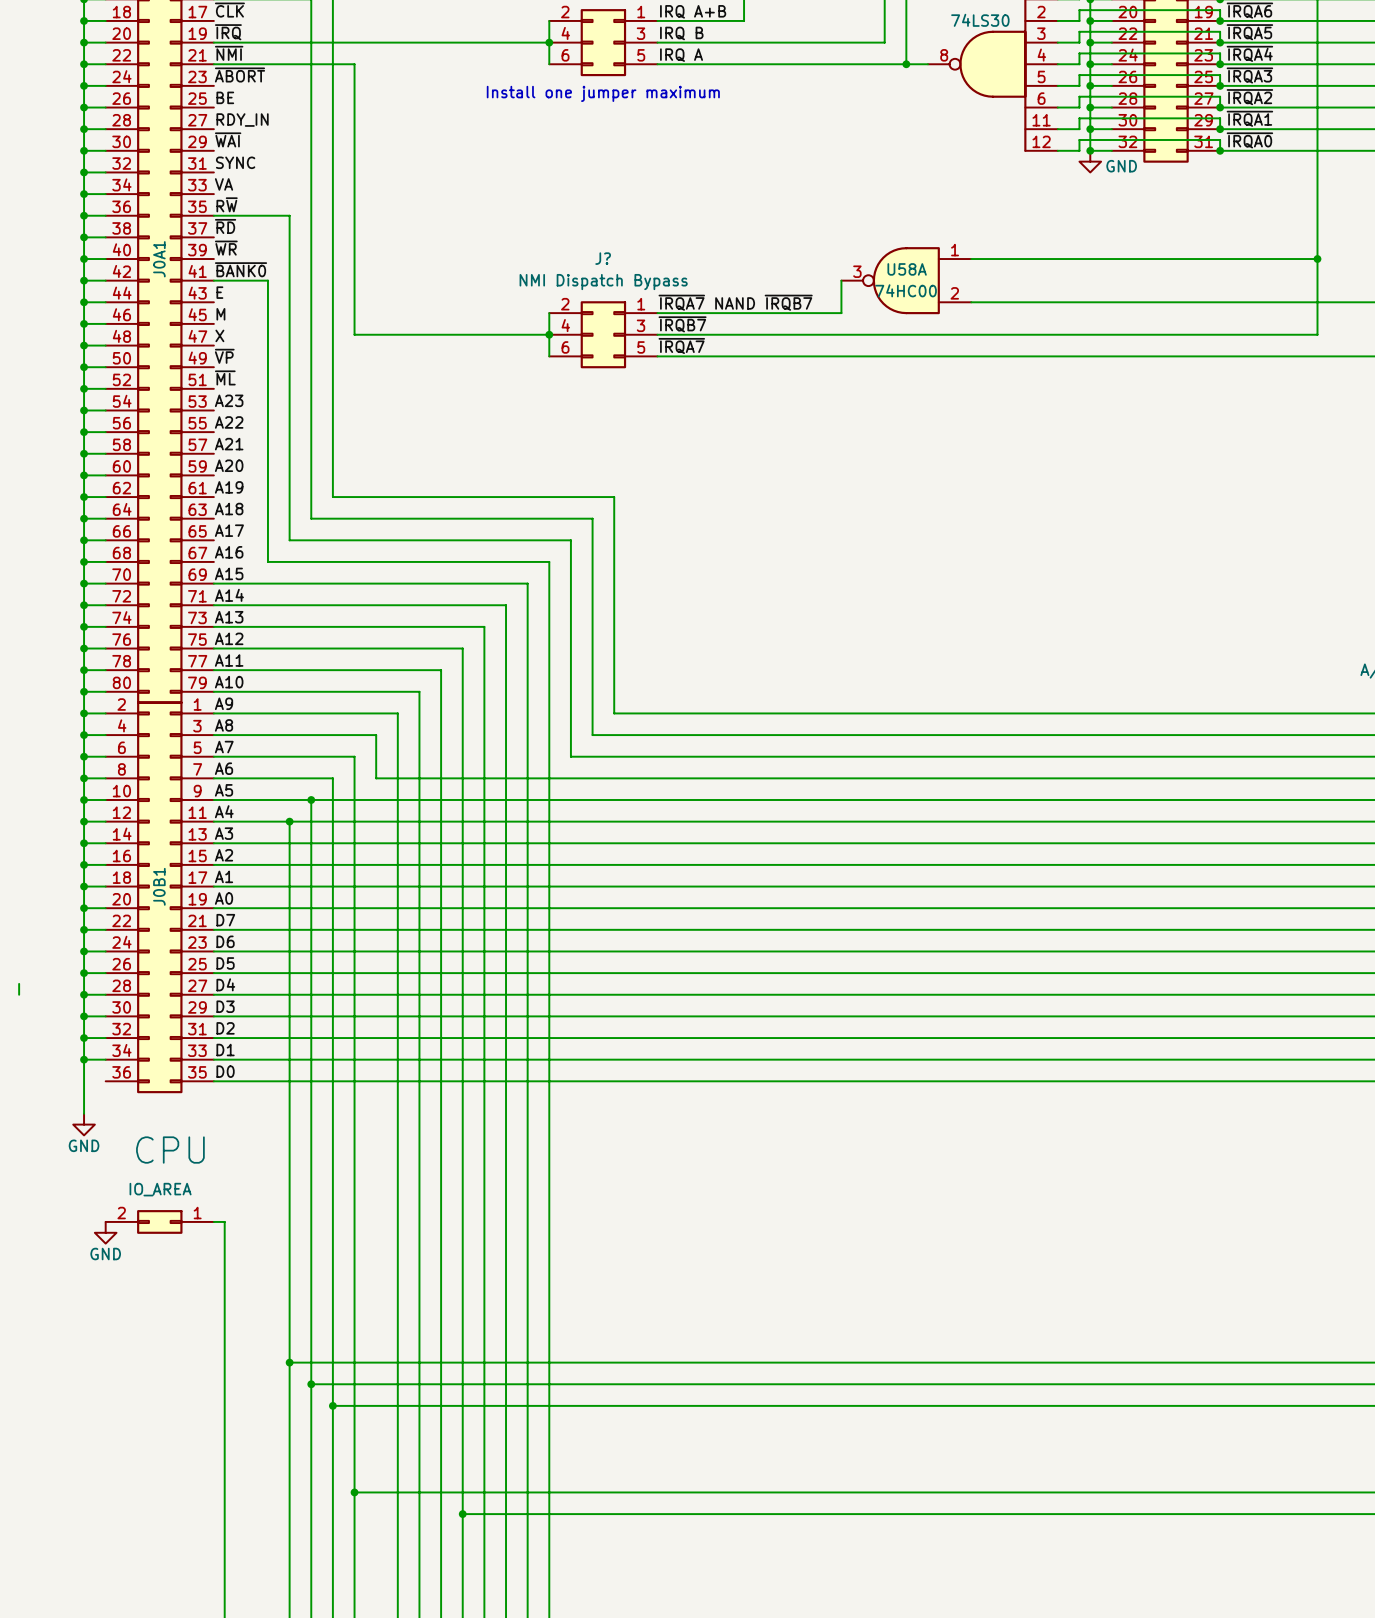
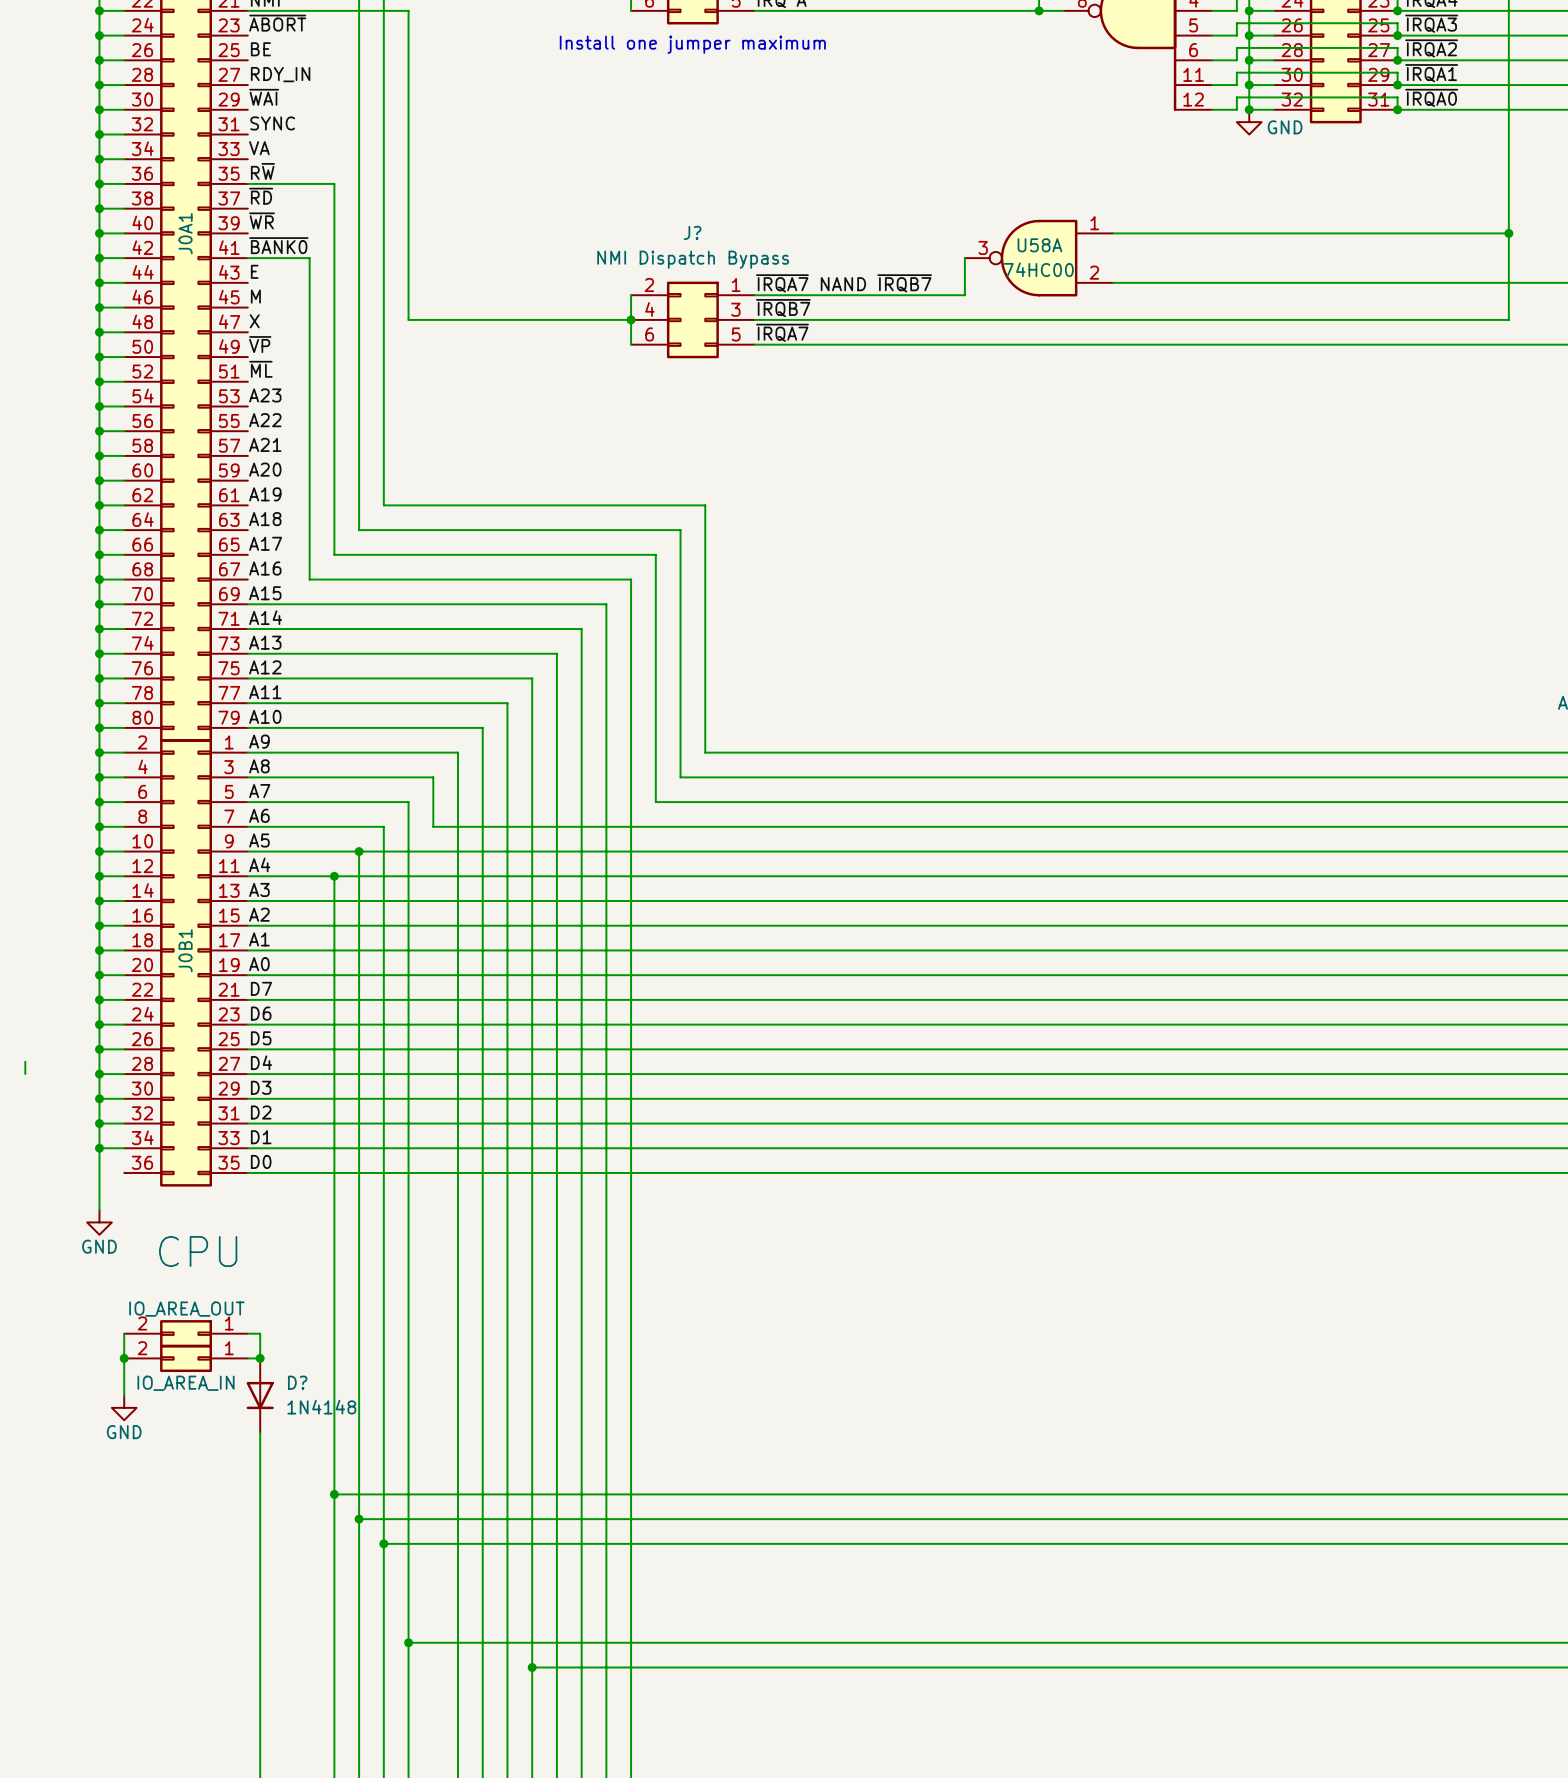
part value: IO_AREA (160, 1189) -> IO_AREA_OUT (186, 1309)
wire: none -> (124, 1333) (124, 1395)
power symbol position: GND (105, 1232) -> GND (124, 1407)
junction: none -> (124, 1358)
part: none -> IO_AREA_IN (186, 1358)
junction: none -> (260, 1358)
D?: none -> 1N4148 (260, 1395)

